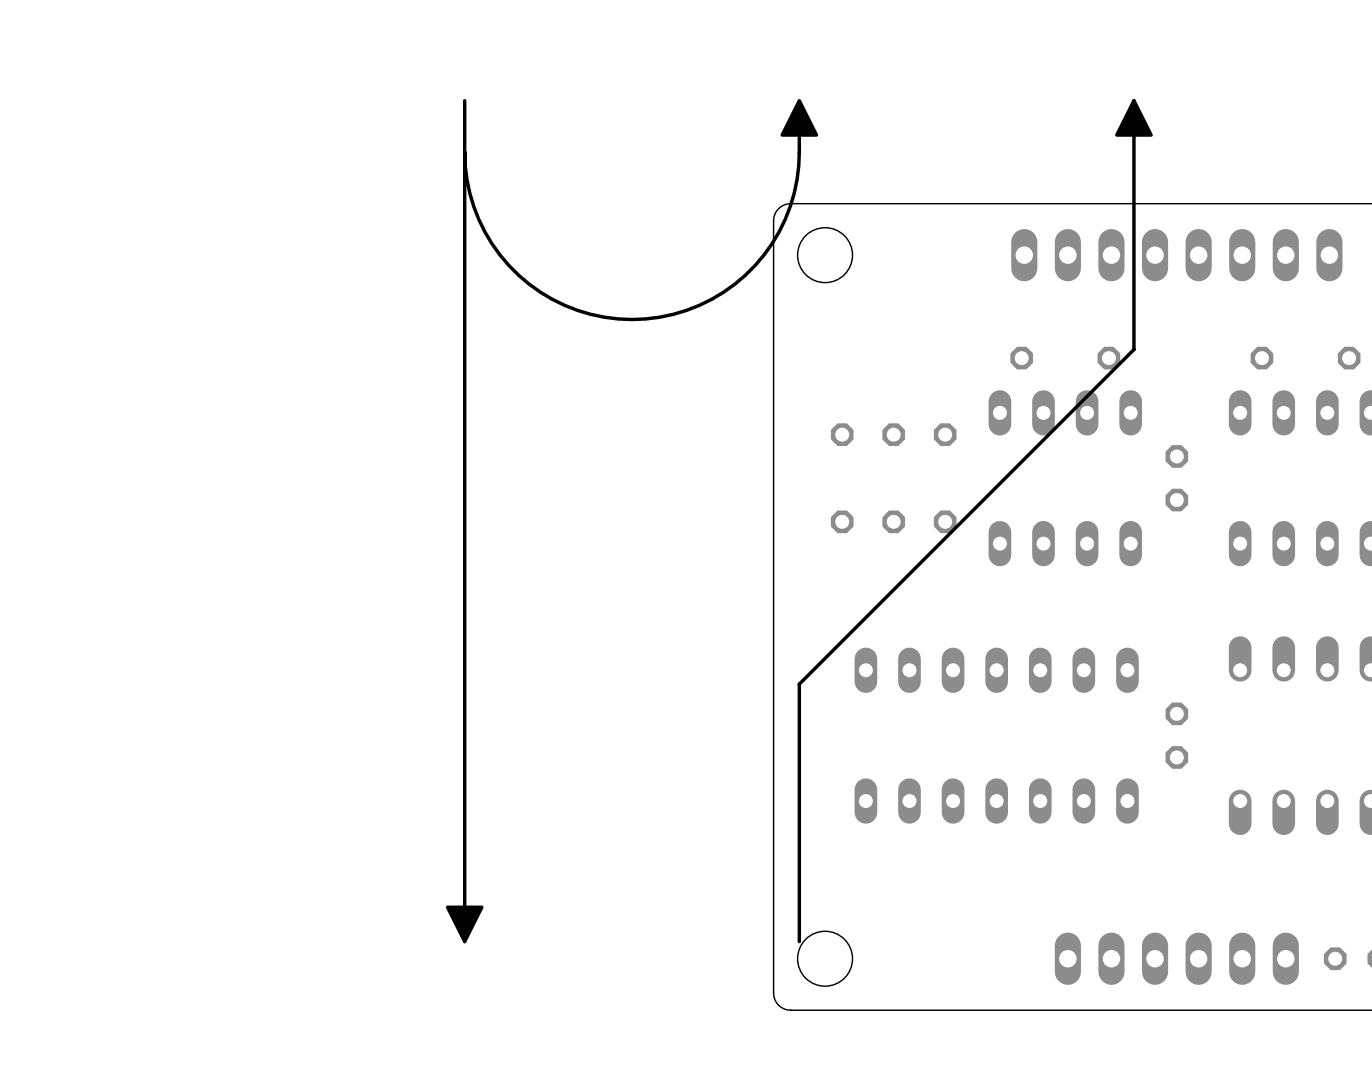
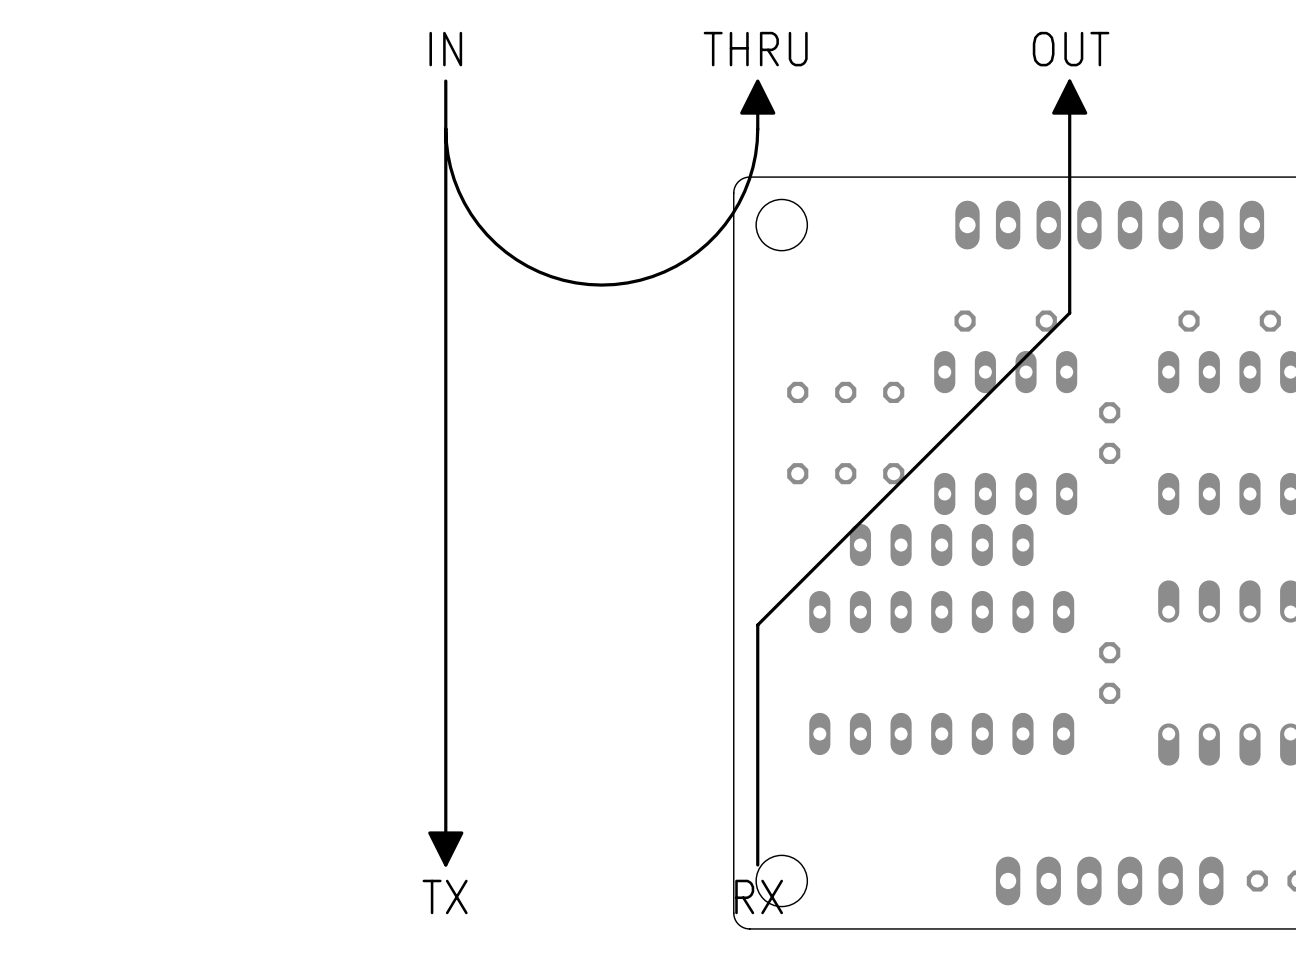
text: none -> IN (445, 49)
text: none -> THRU (755, 49)
text: none -> OUT (1071, 49)
part: none -> (941, 545)
text: none -> TX (445, 896)
text: none -> RX (759, 896)

